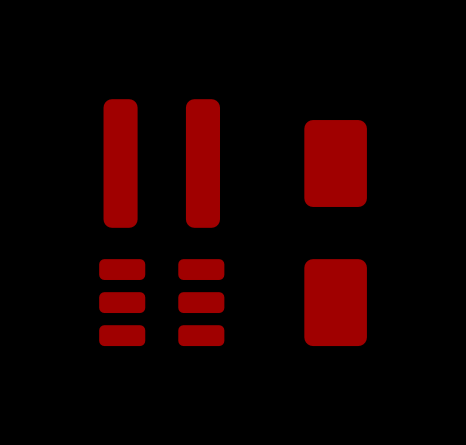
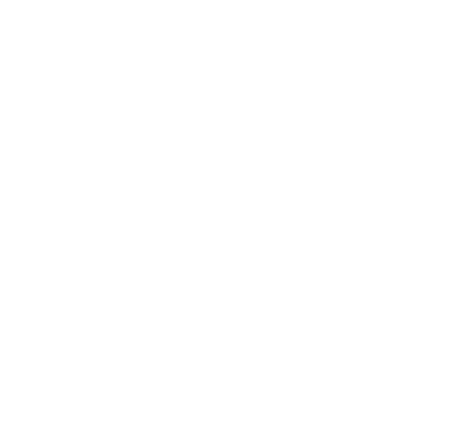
part: (161, 163) -> none
part: (335, 233) -> none
part: (161, 302) -> none

